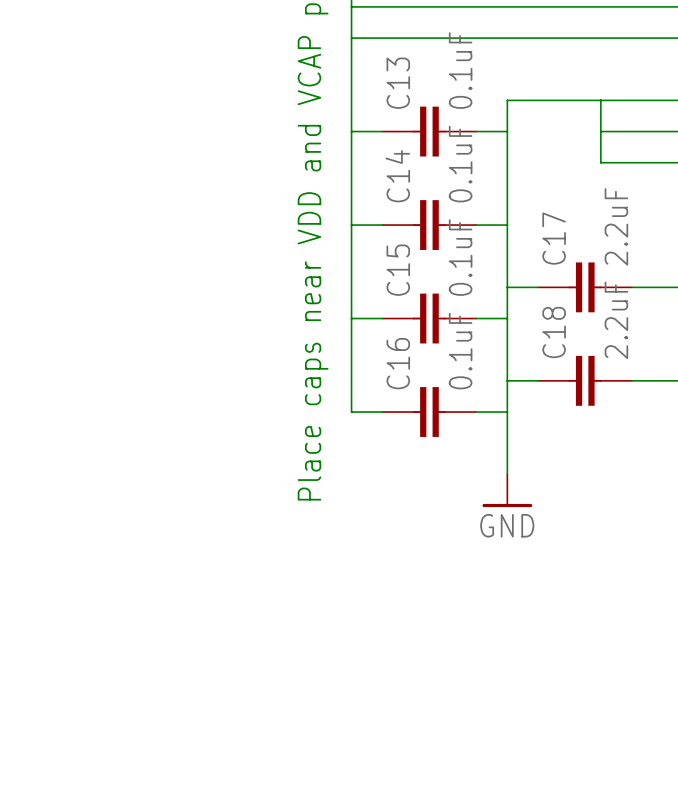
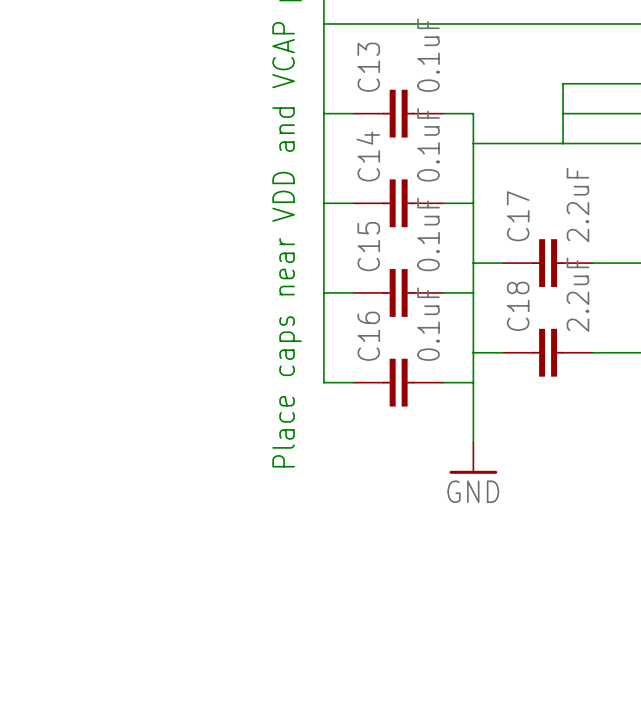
wire: (600, 100) (507, 100) (507, 131) -> none
wire: none -> (473, 143) (563, 143)

